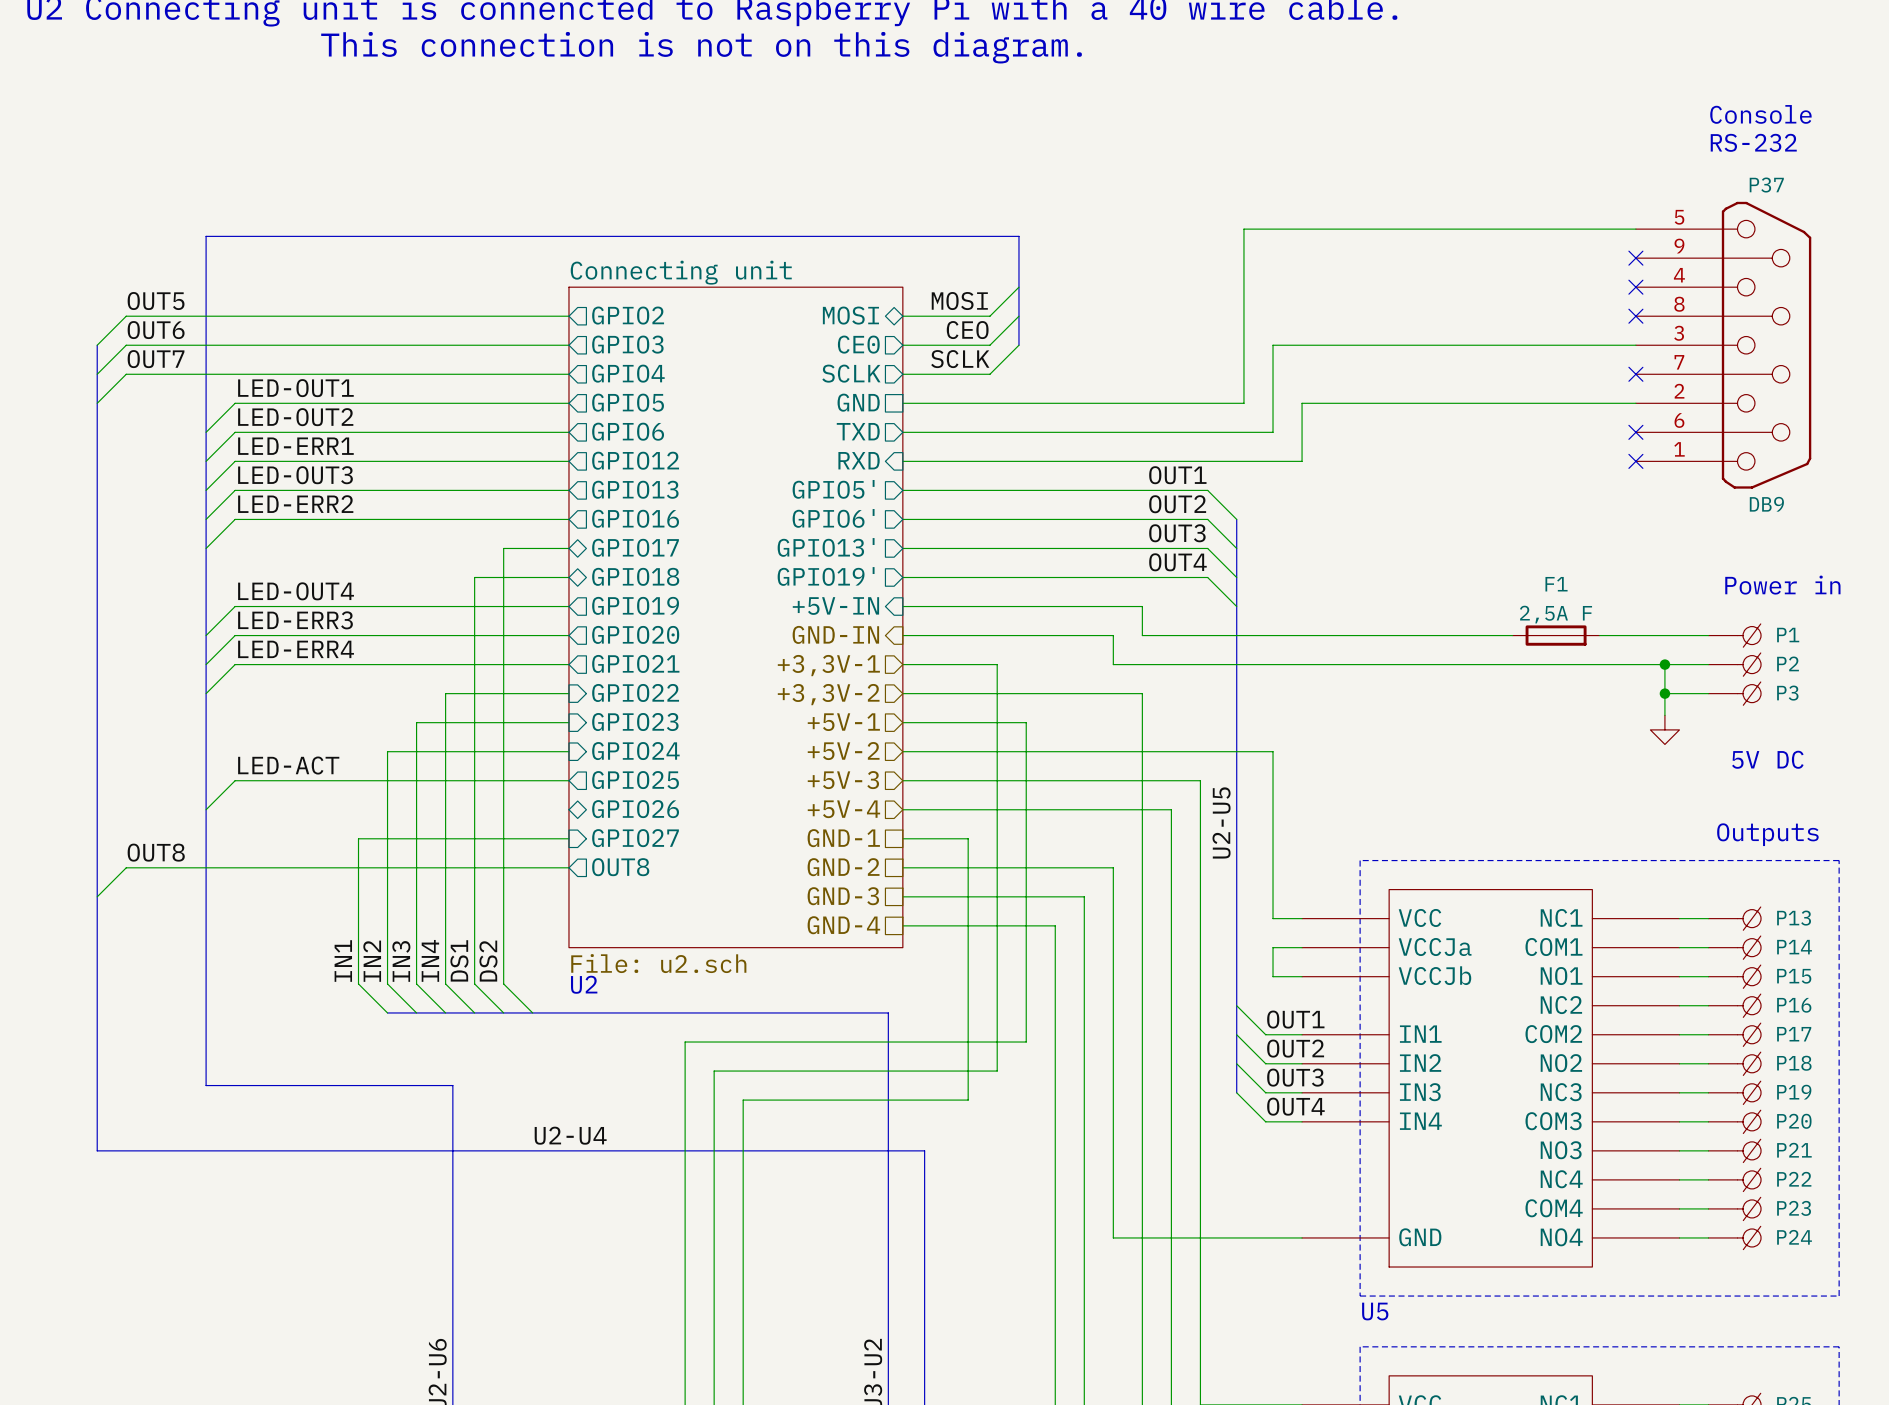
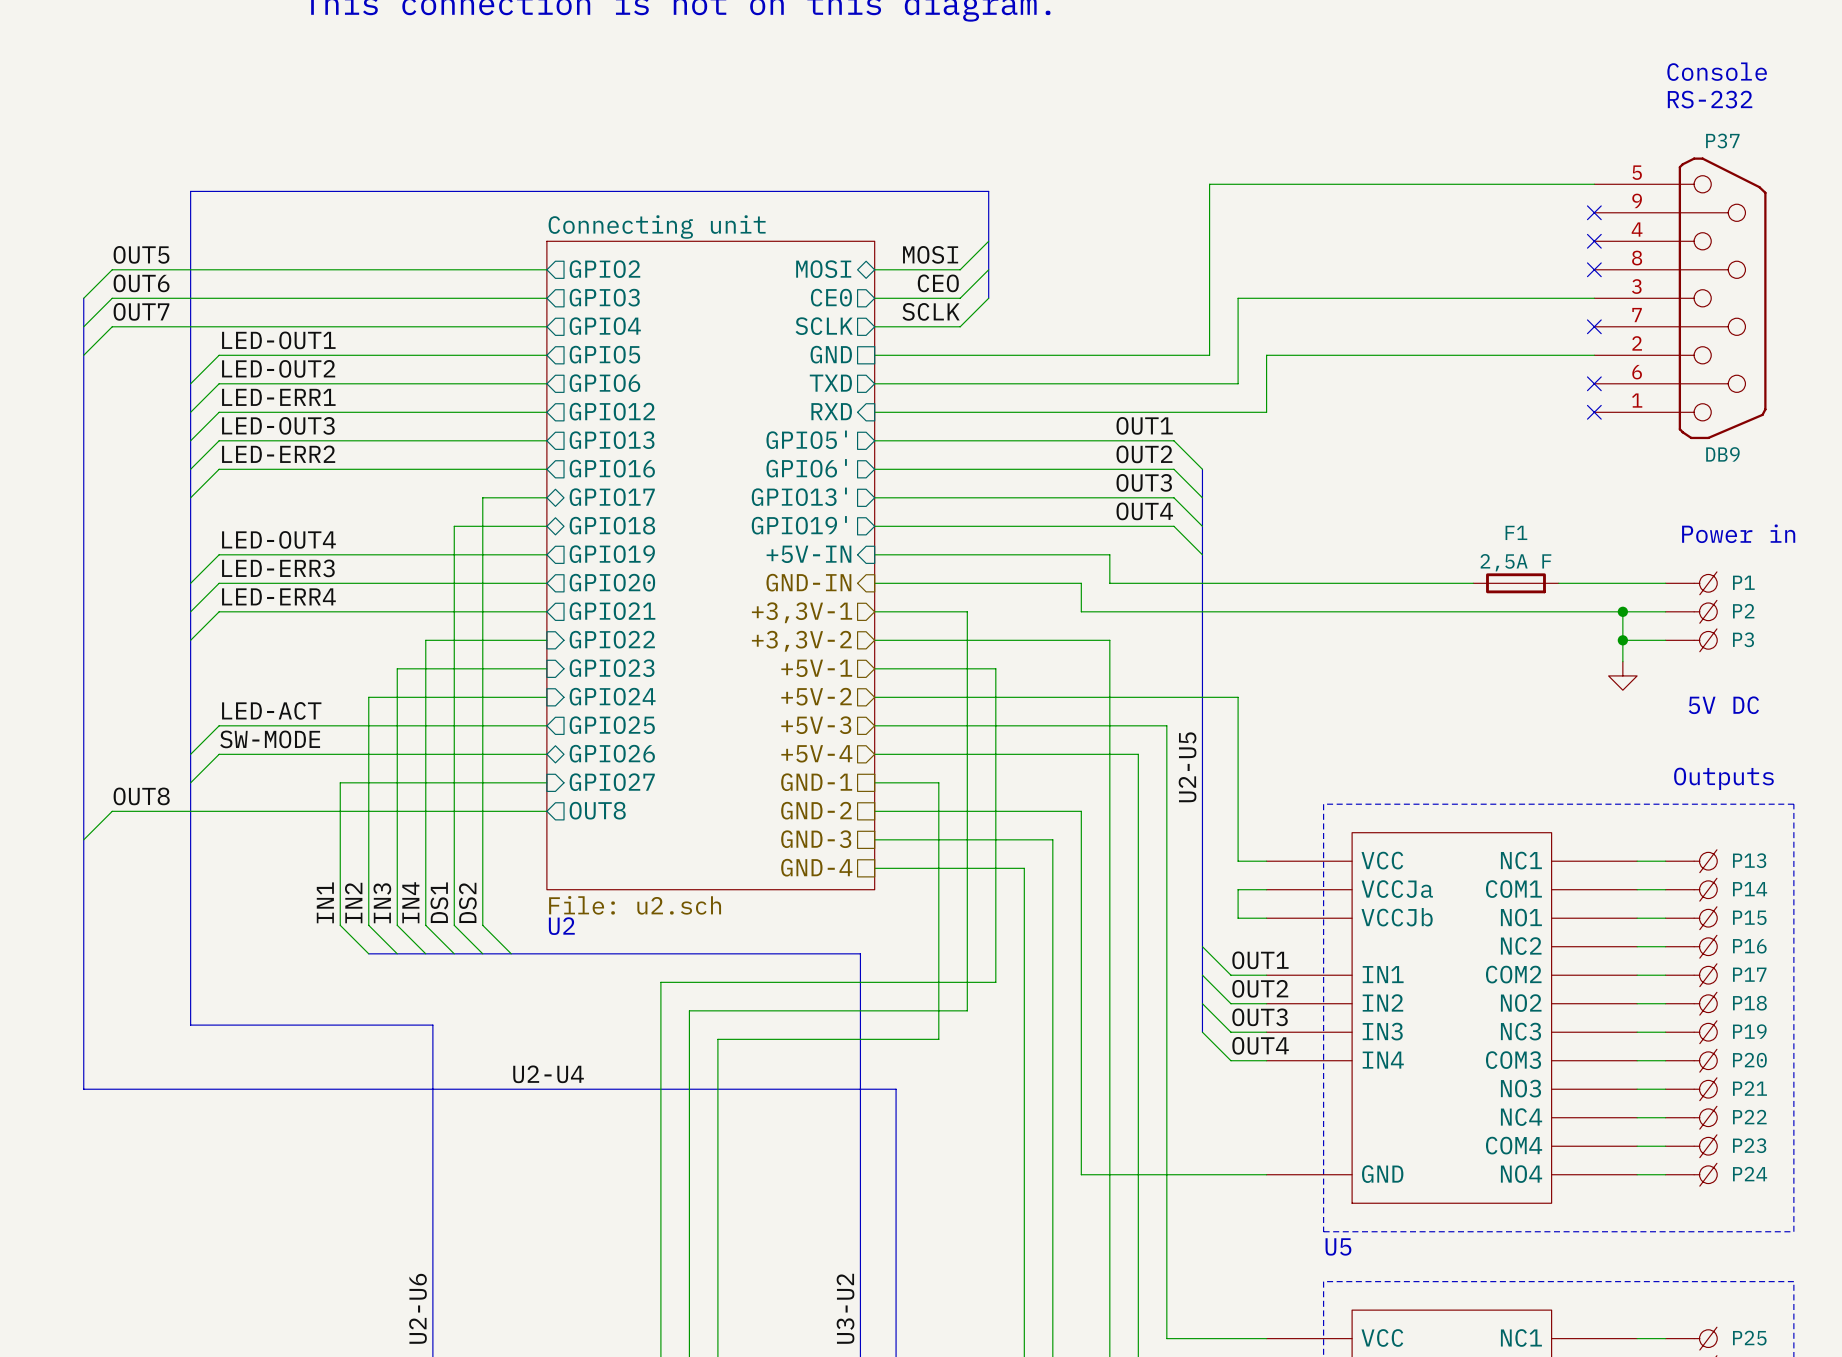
label: none -> SW-MODE (270, 739)
wire: none -> (546, 754) (219, 754) (190, 782)

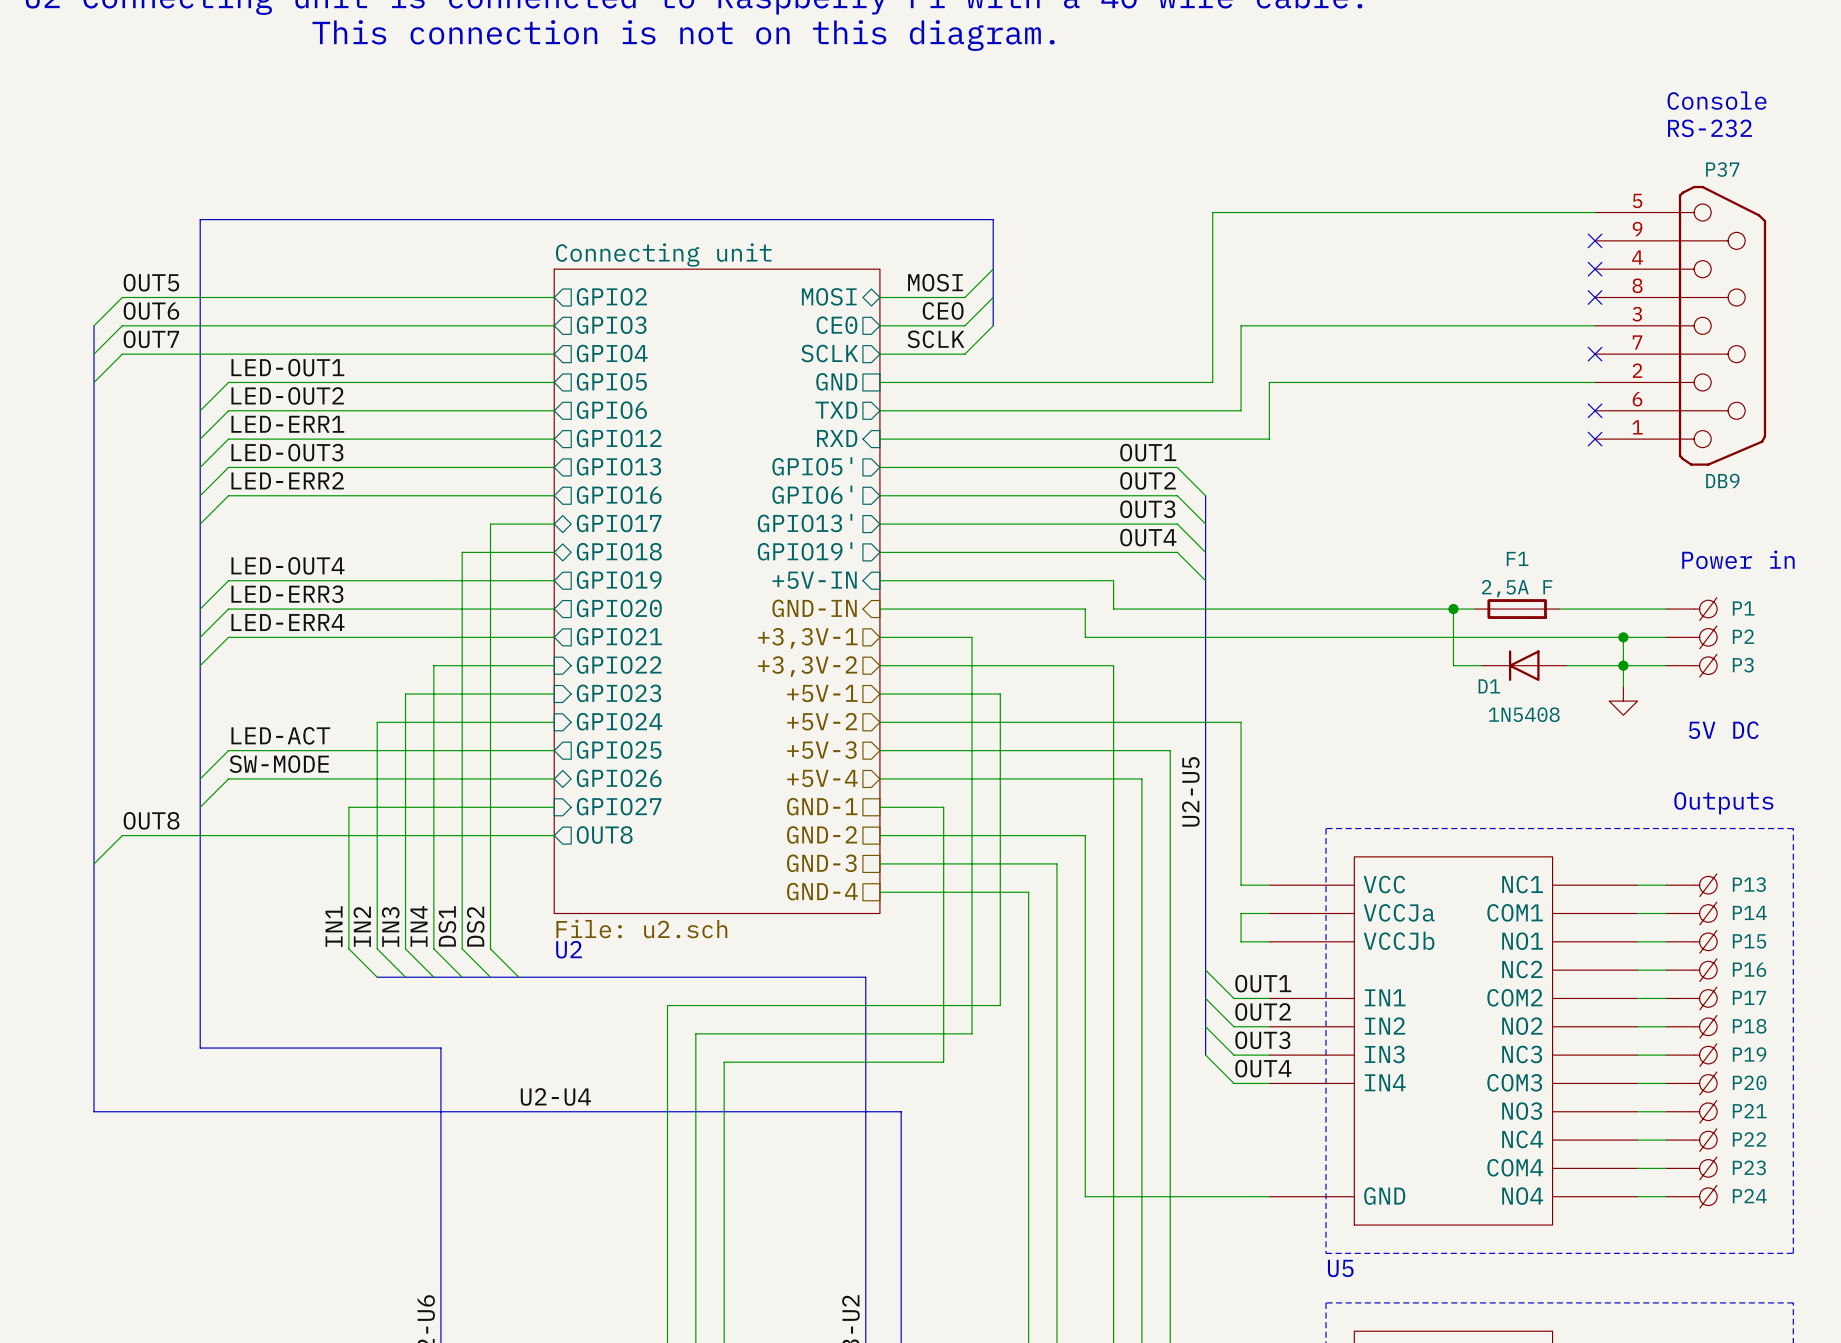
wire: none -> (1453, 609) (1453, 665) (1481, 665)
junction: none -> (1453, 609)
D1: none -> 1N5408 (1524, 665)
wire: none -> (1566, 665) (1623, 665)

